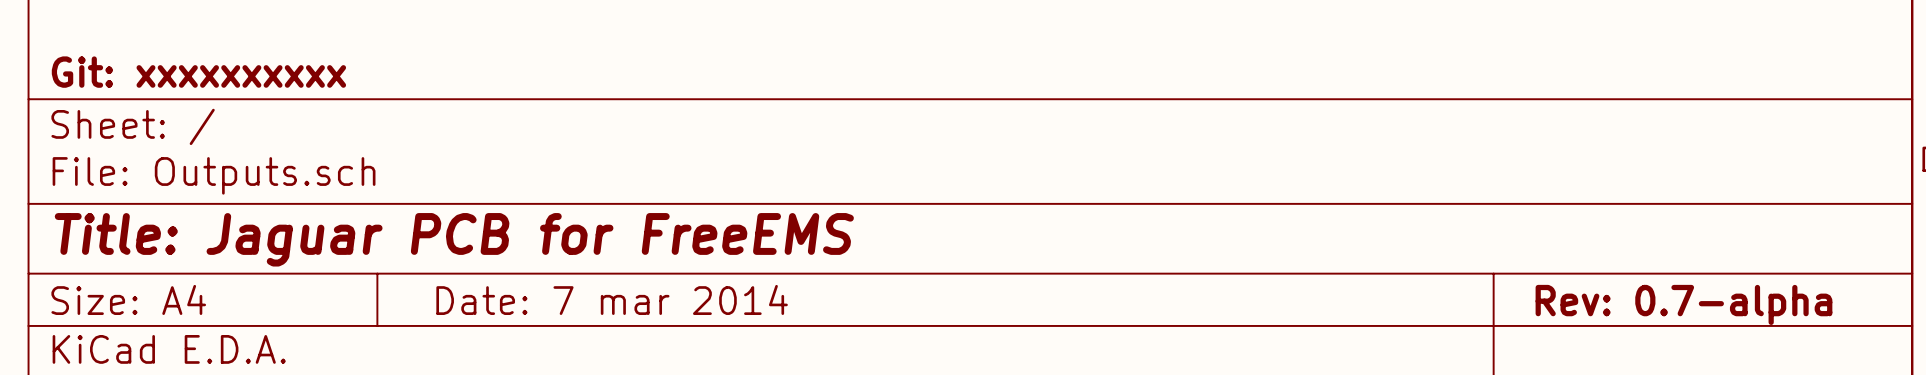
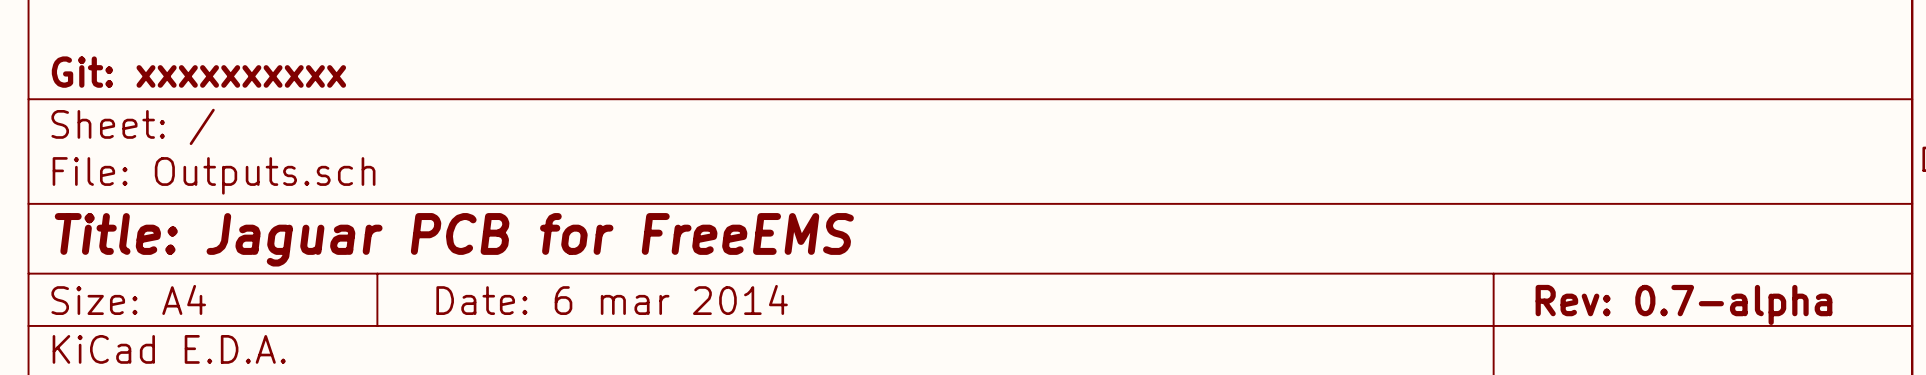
title block: Date: 7 mar 2014 (612, 299) -> Date: 6 mar 2014 (612, 299)

